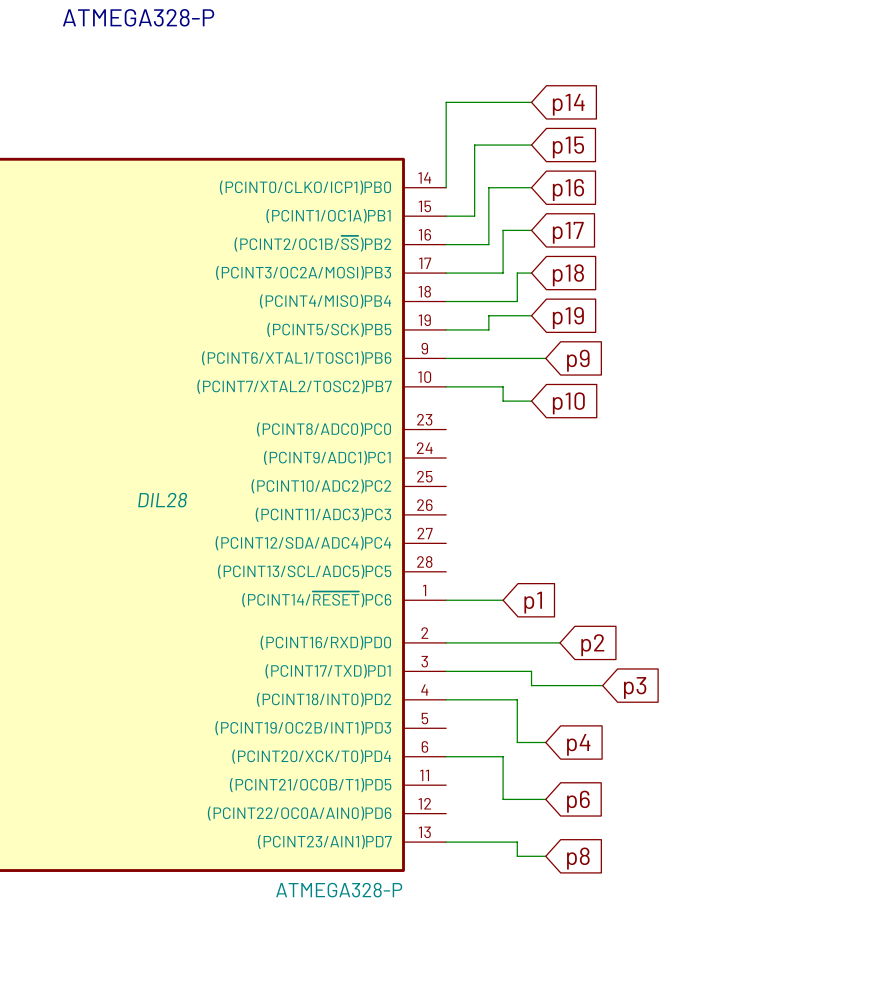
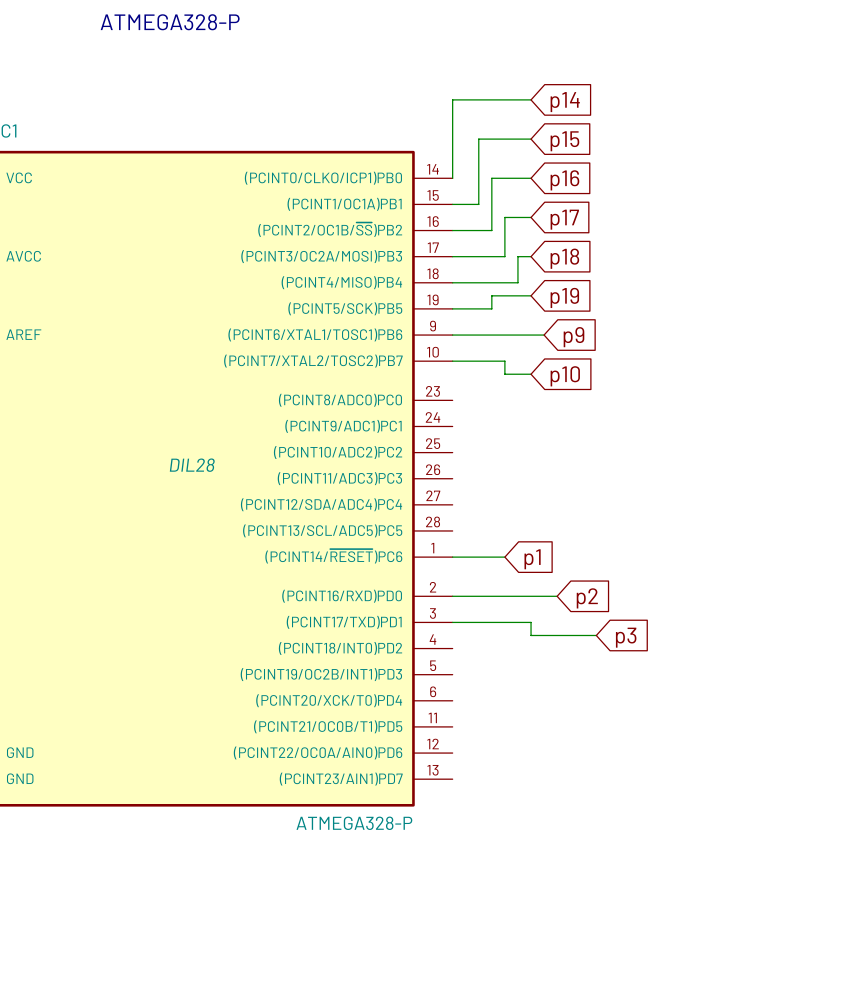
wire: (446, 699) (517, 699) (517, 742) (545, 742) -> none
global label: p4 (578, 744) -> none
wire: (446, 756) (503, 756) (503, 799) (545, 799) -> none
global label: p6 (578, 801) -> none
wire: (446, 842) (517, 842) (517, 856) (545, 856) -> none
global label: p8 (578, 858) -> none

